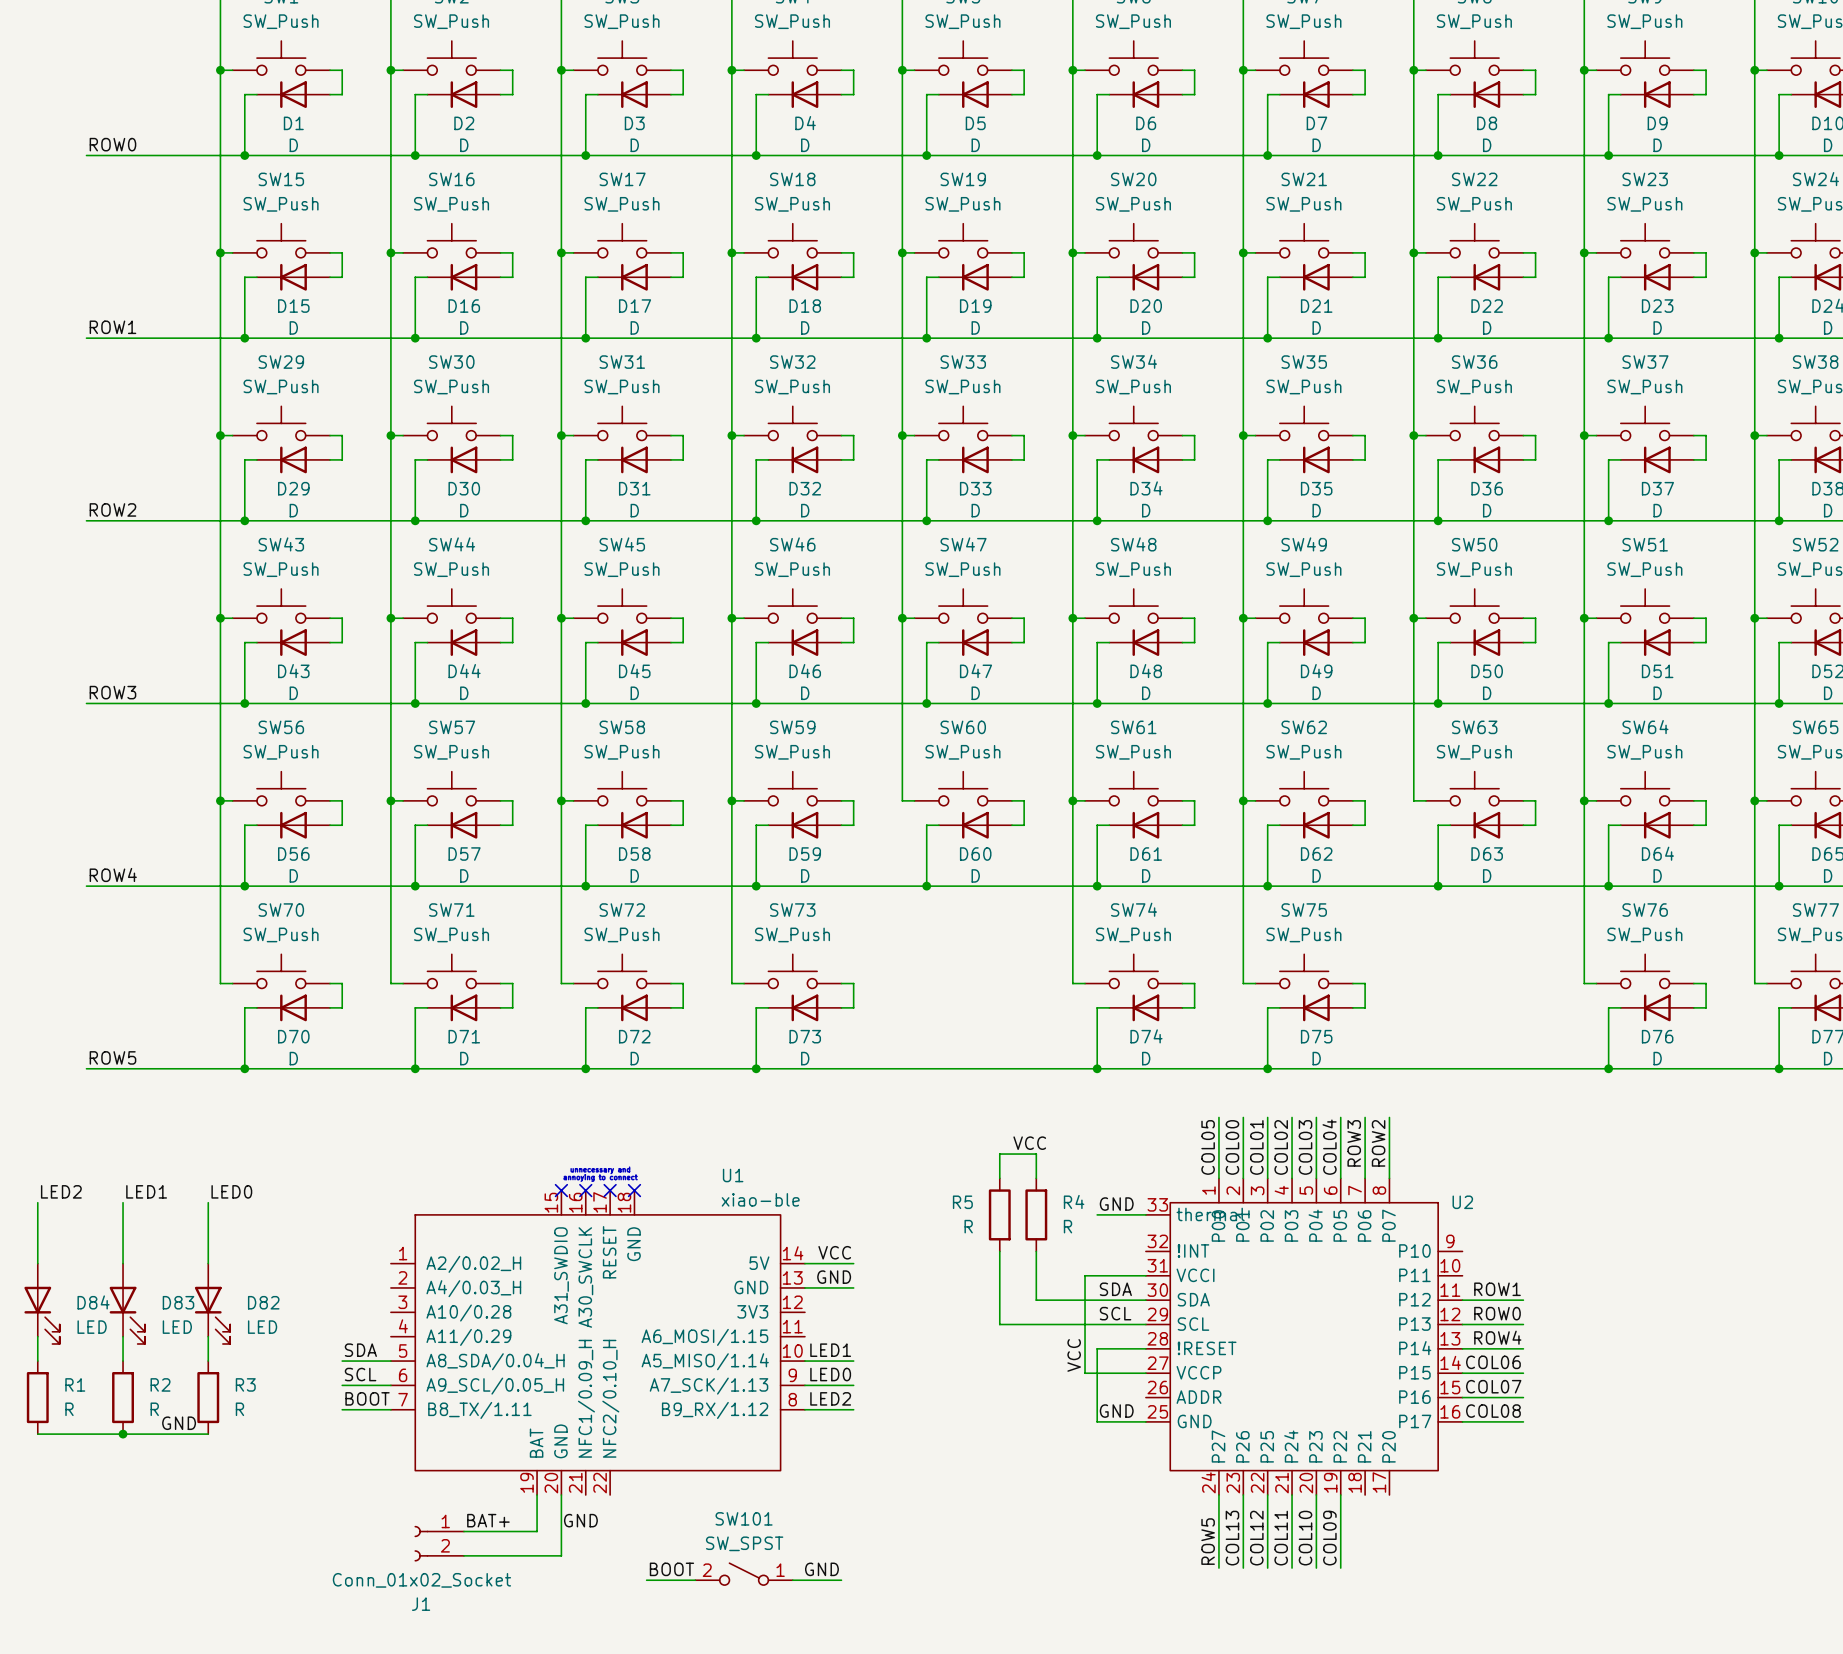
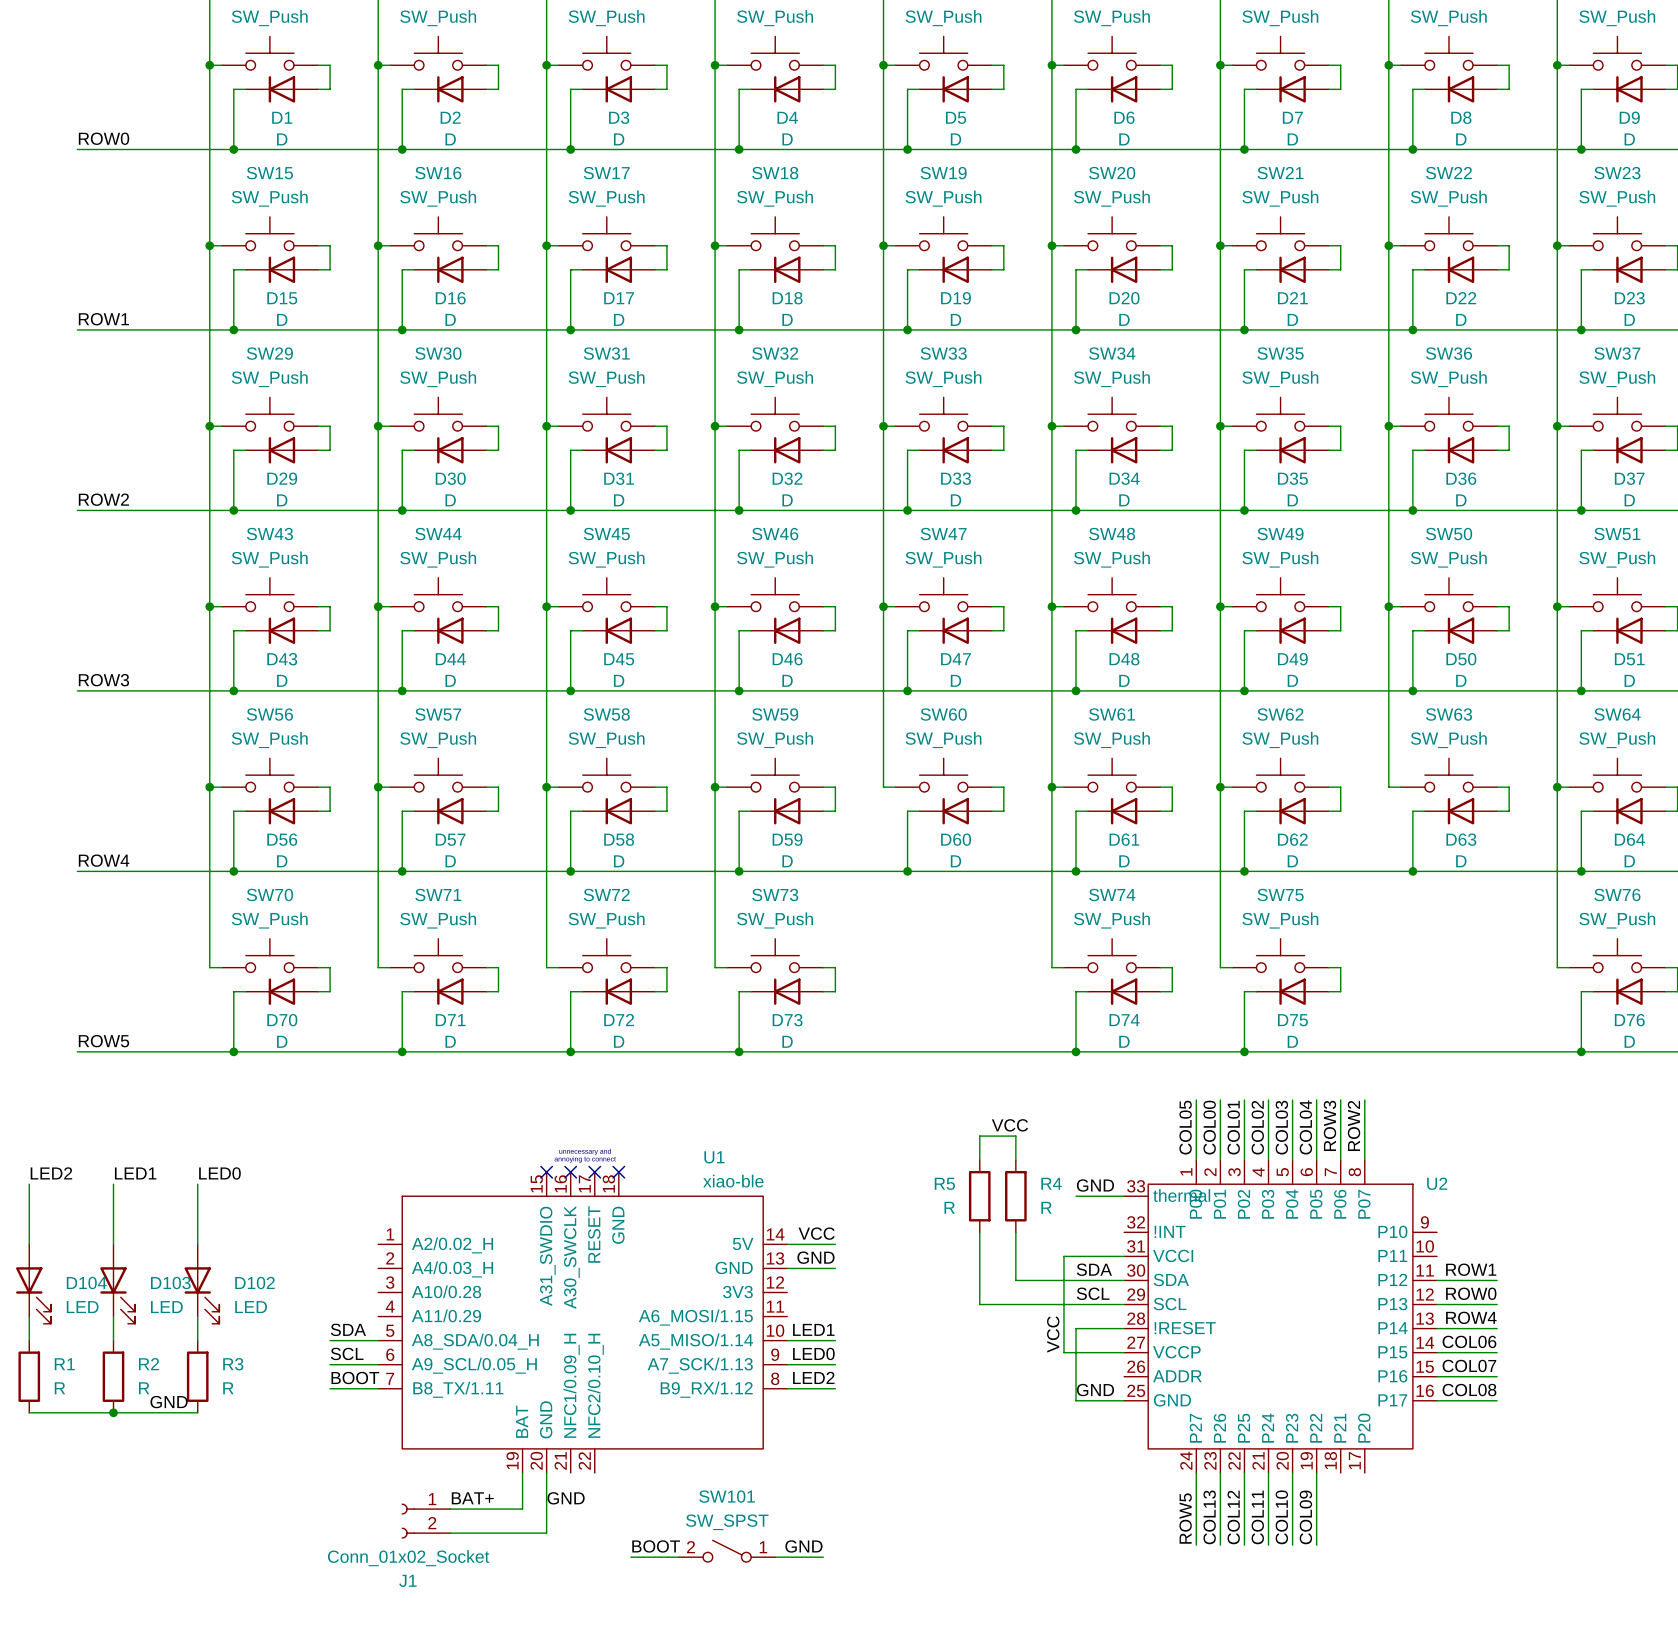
D84 name: D84 (93, 1302) -> D104 (86, 1283)
D83 name: D83 (178, 1302) -> D103 (170, 1283)
D82 name: D82 (263, 1302) -> D102 (254, 1283)

